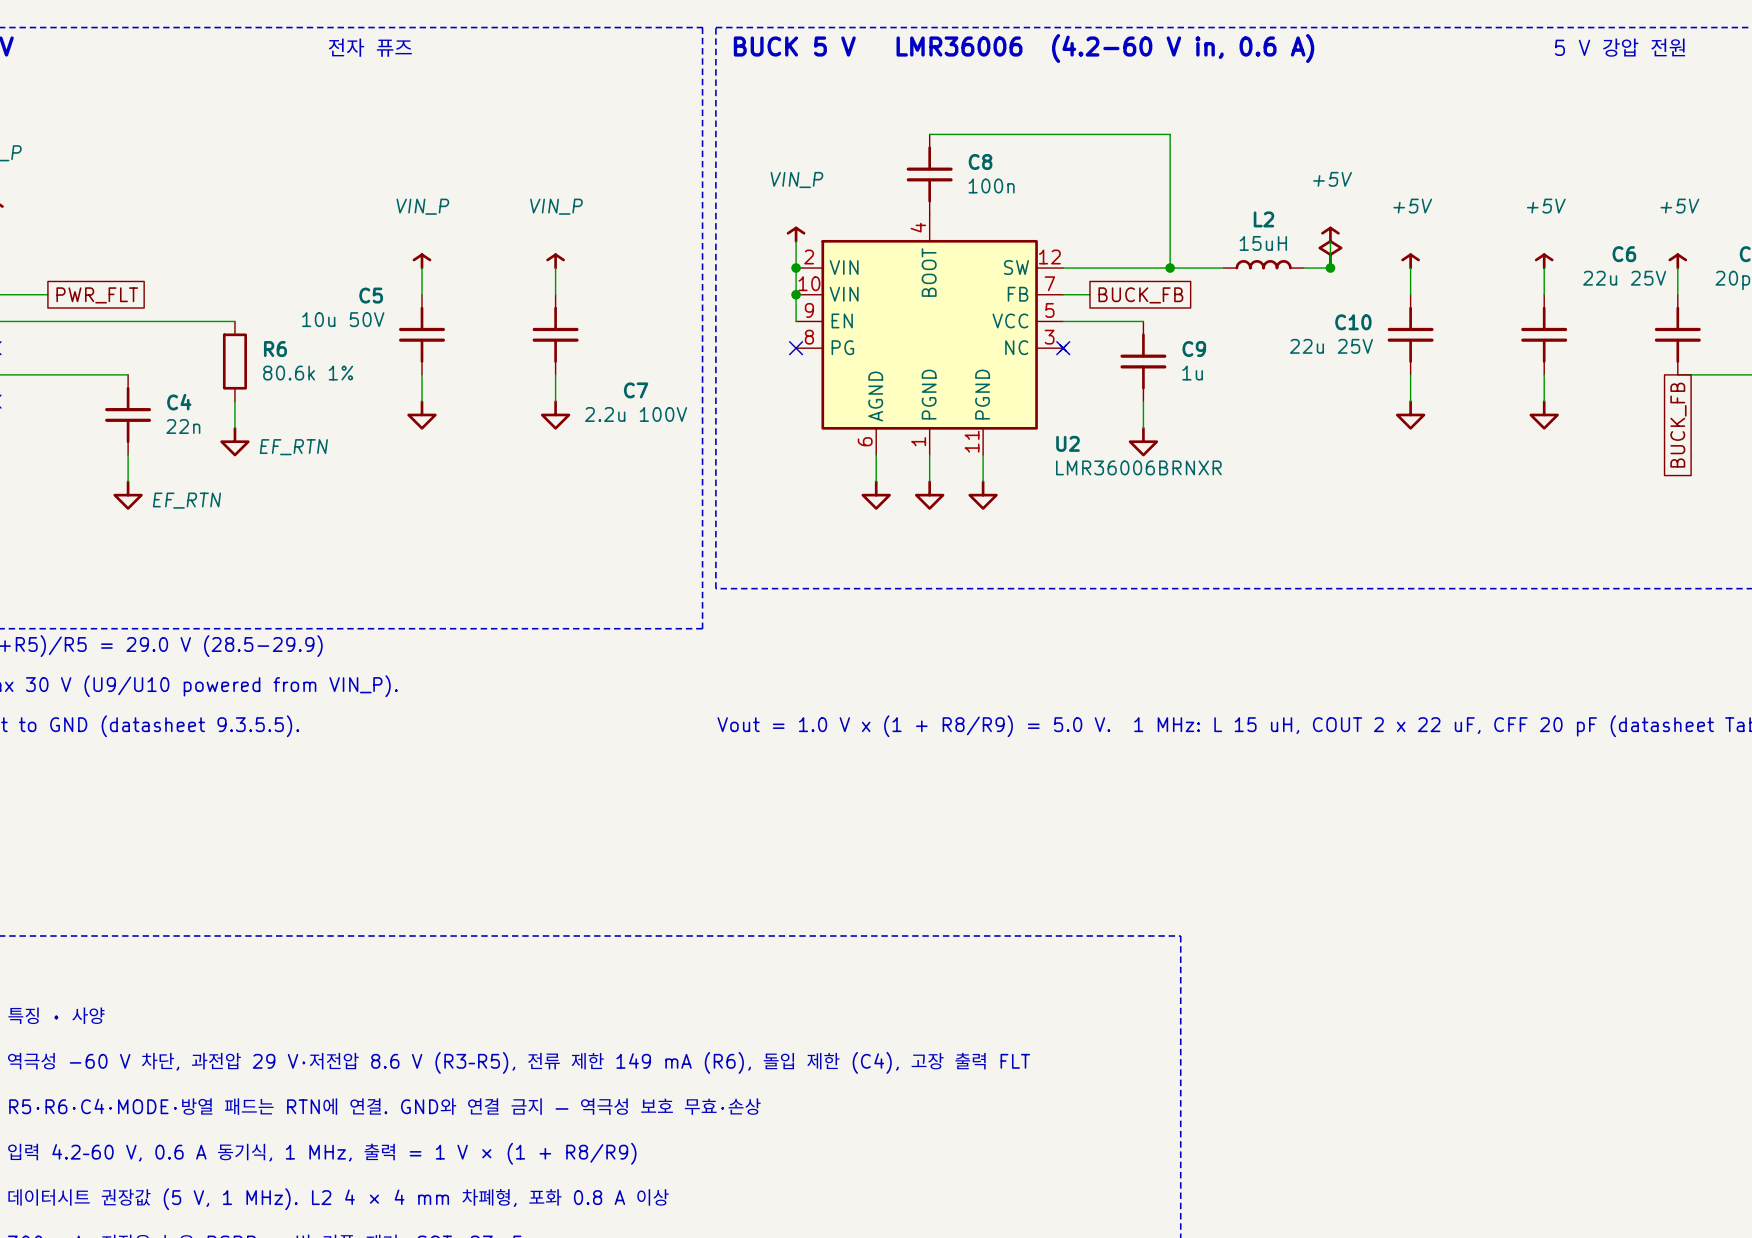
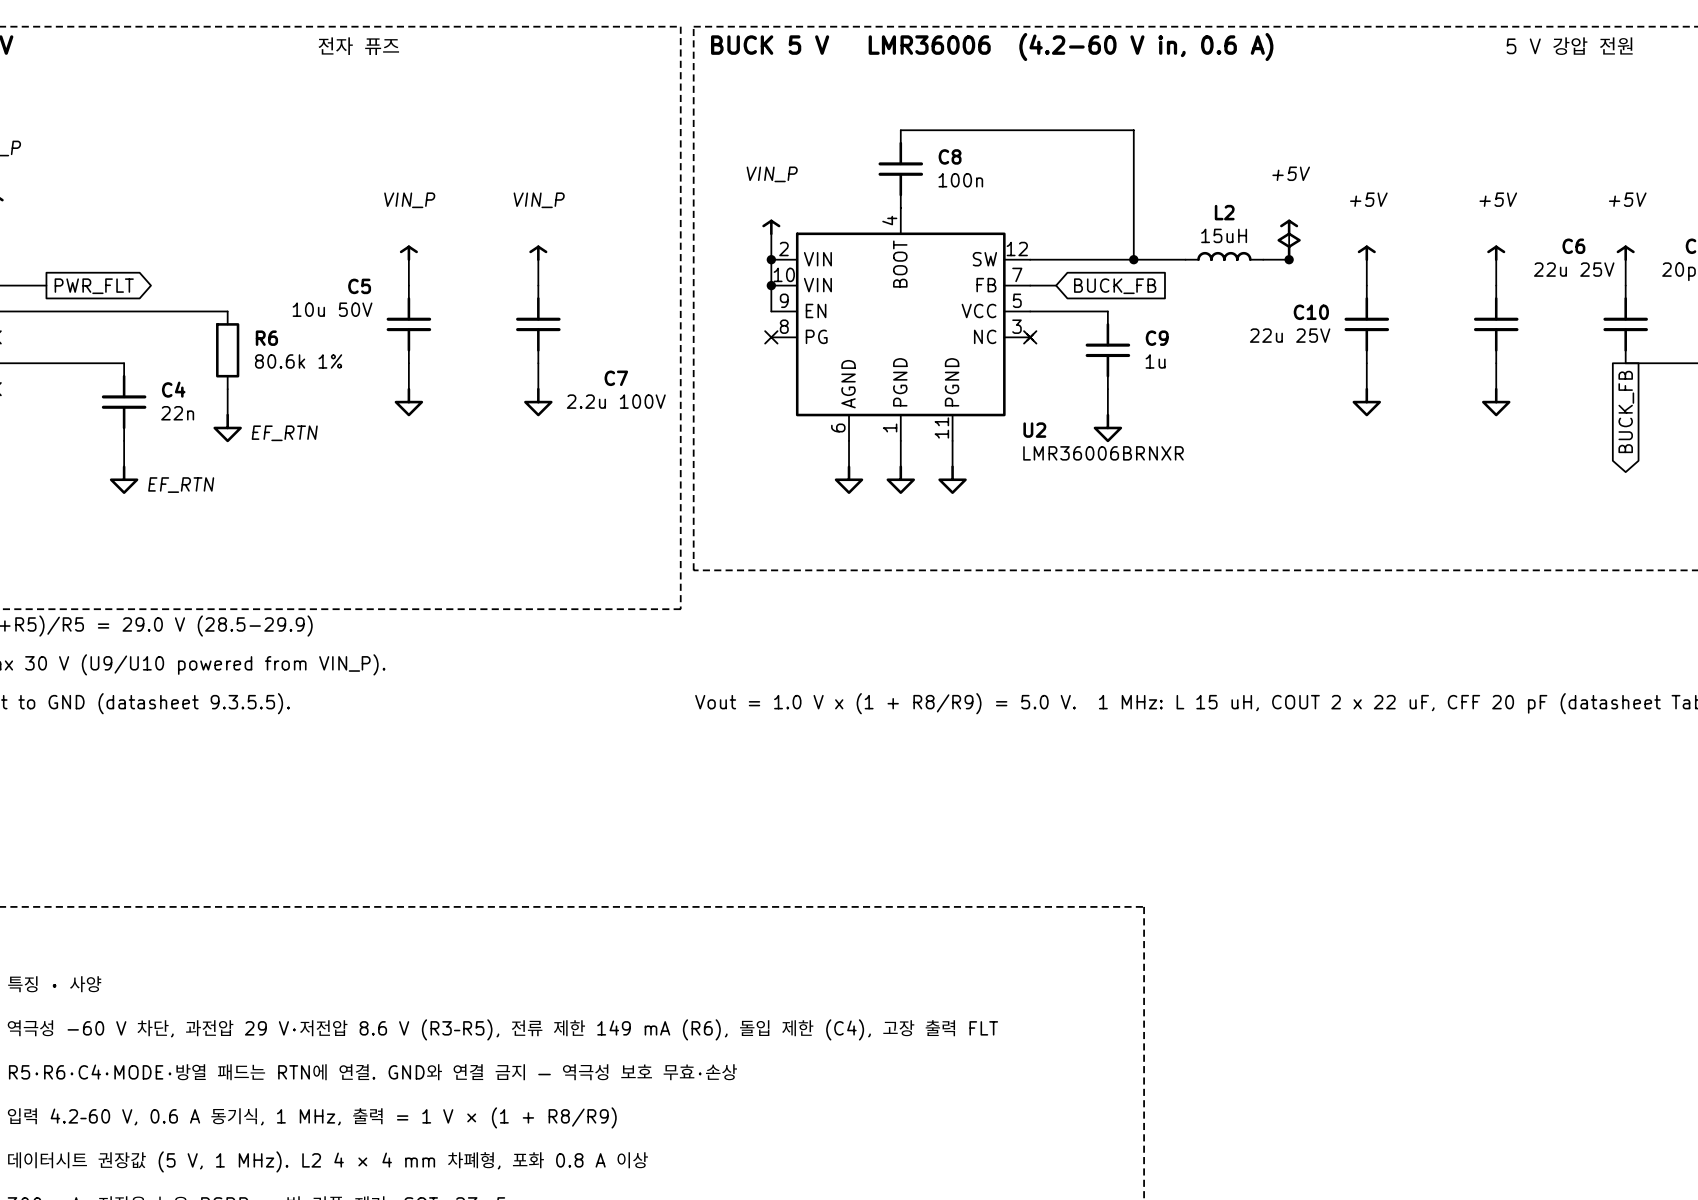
global label shape: passive (97, 295) -> output (94, 286)
global label shape: passive (1140, 295) -> input (1115, 286)
global label shape: passive (1678, 425) -> output (1626, 411)

